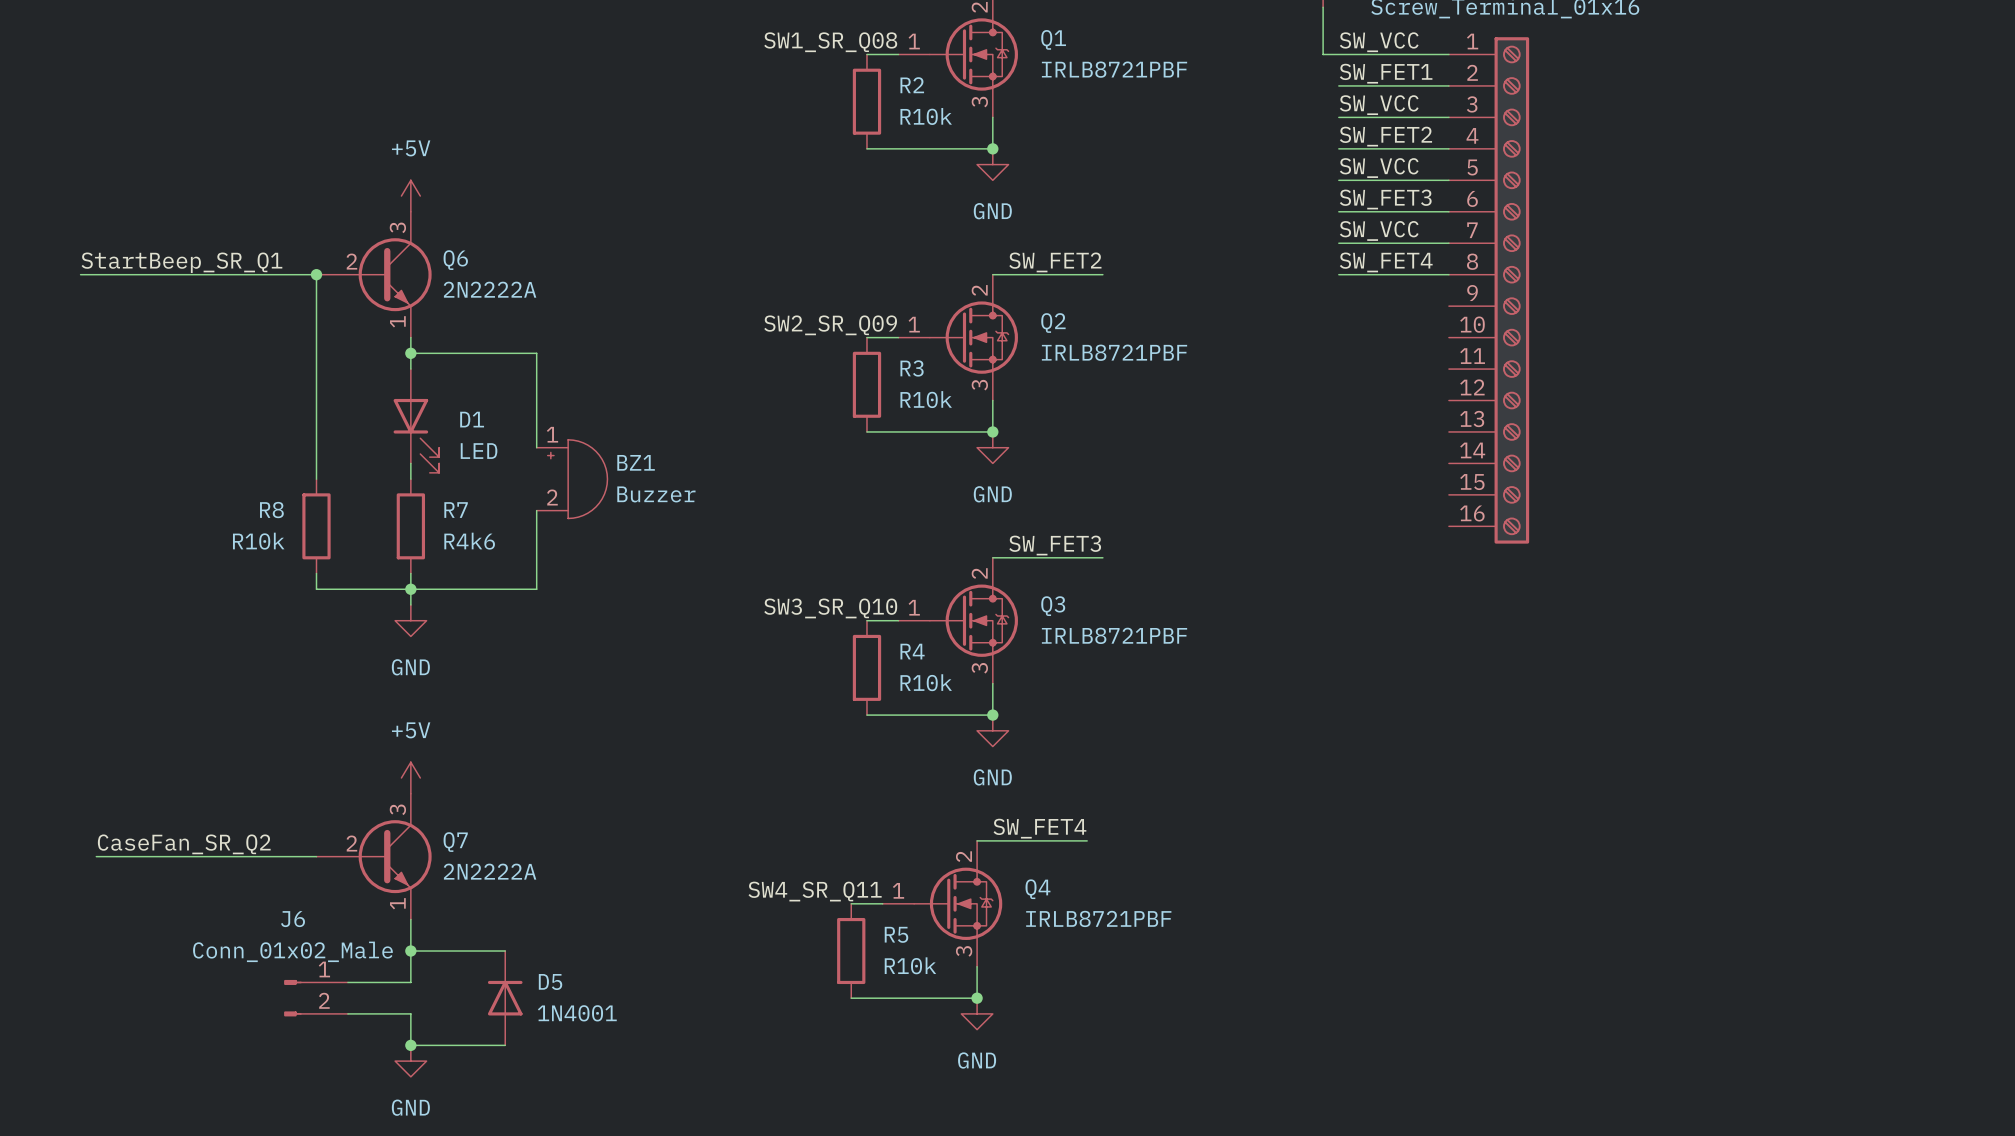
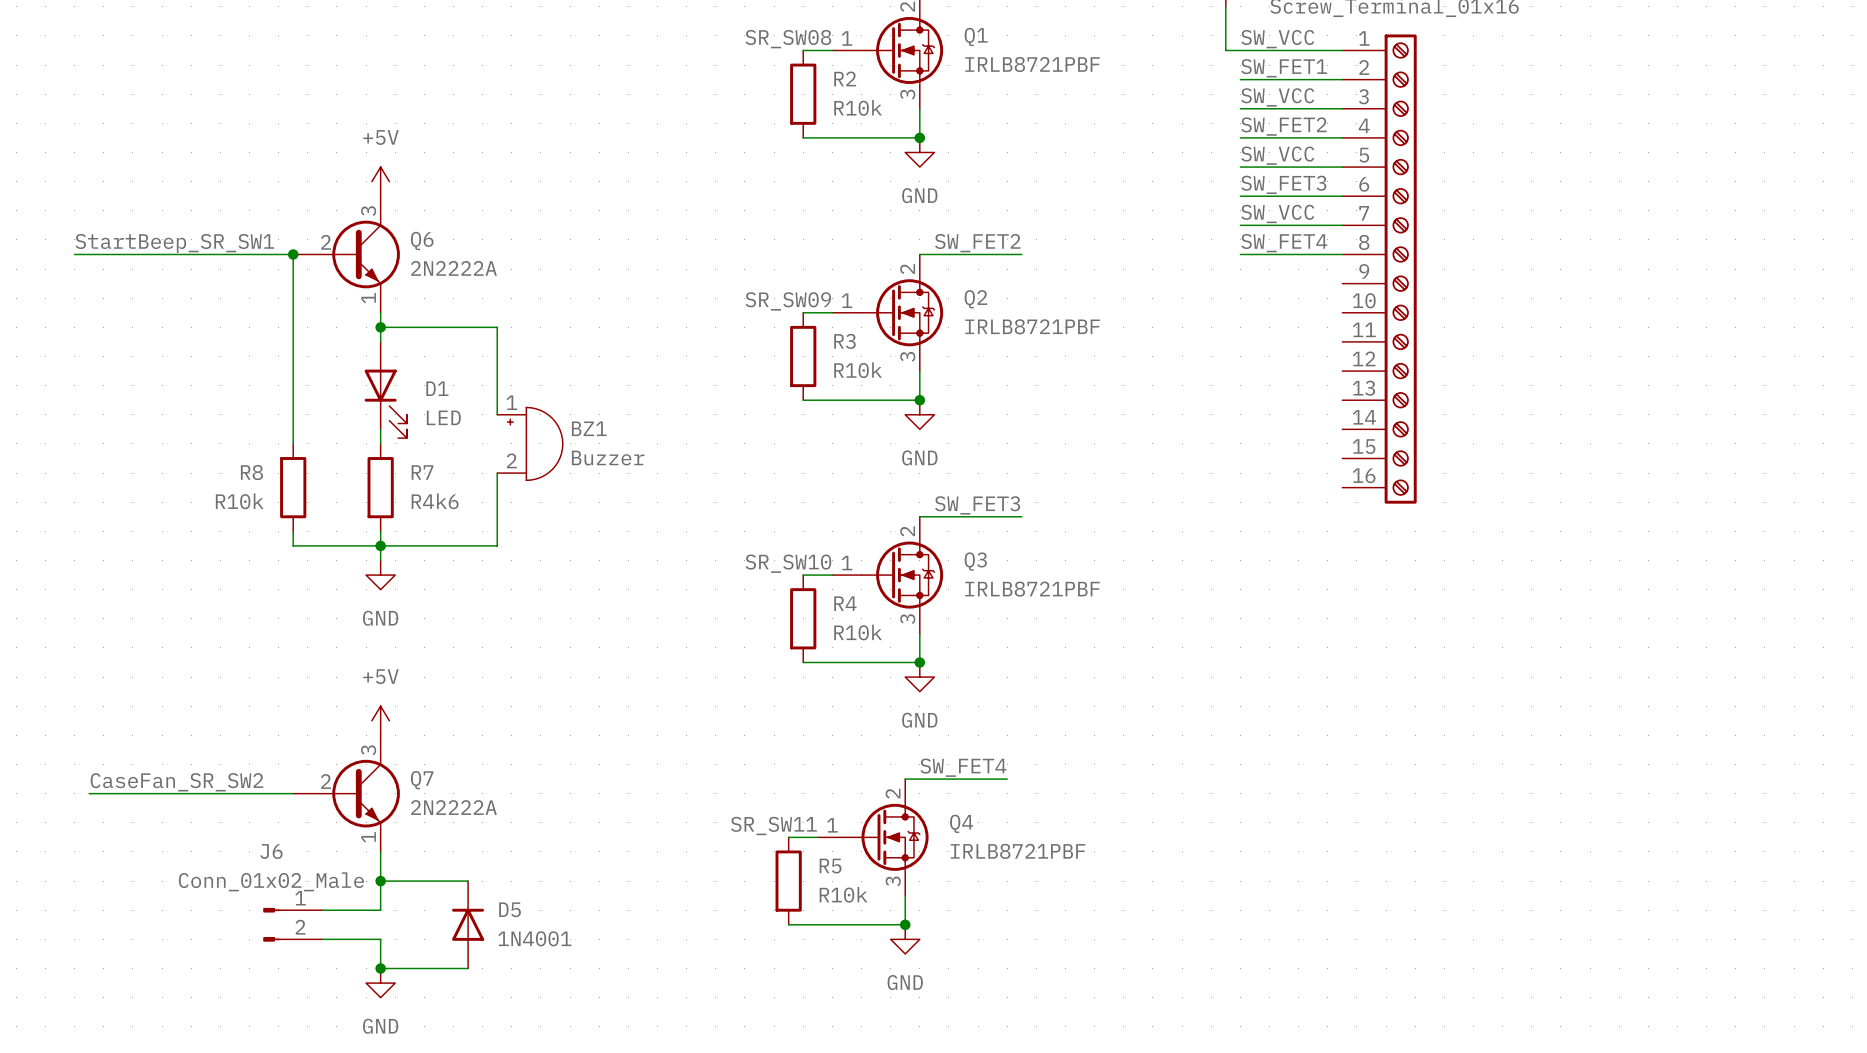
label: SW1_SR_Q08 (830, 42) -> SR_SW08 (788, 39)
label: StartBeep_SR_Q1 (181, 262) -> StartBeep_SR_SW1 (174, 243)
label: SW2_SR_Q09 (830, 325) -> SR_SW09 (788, 301)
label: SW3_SR_Q10 (830, 608) -> SR_SW10 (788, 563)
label: CaseFan_SR_Q2 (184, 844) -> CaseFan_SR_SW2 (176, 782)
label: SW4_SR_Q11 (815, 891) -> SR_SW11 (773, 825)

